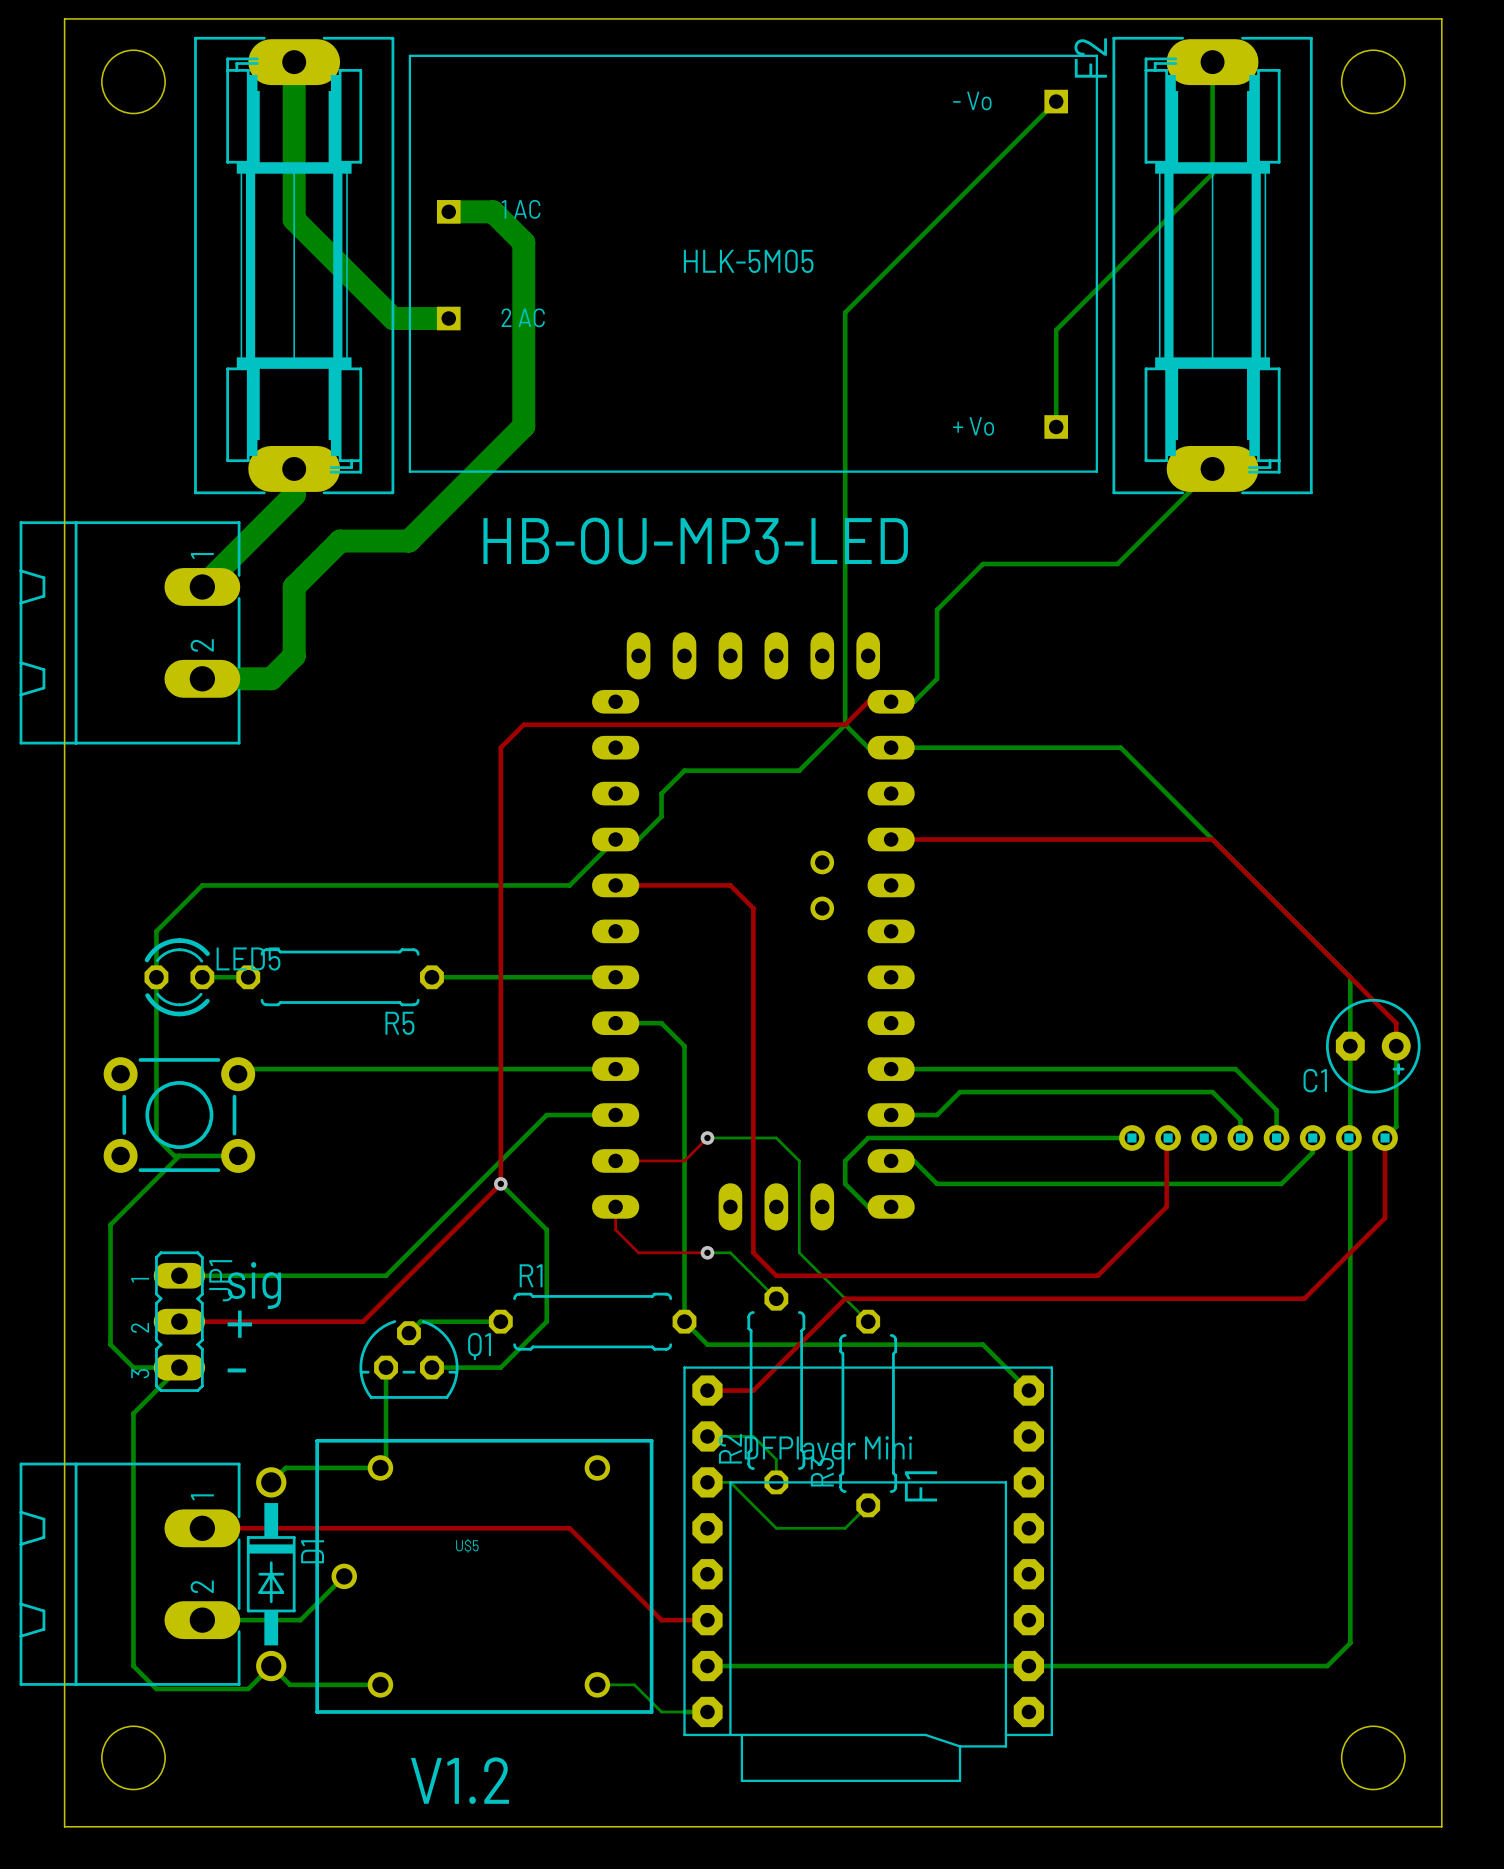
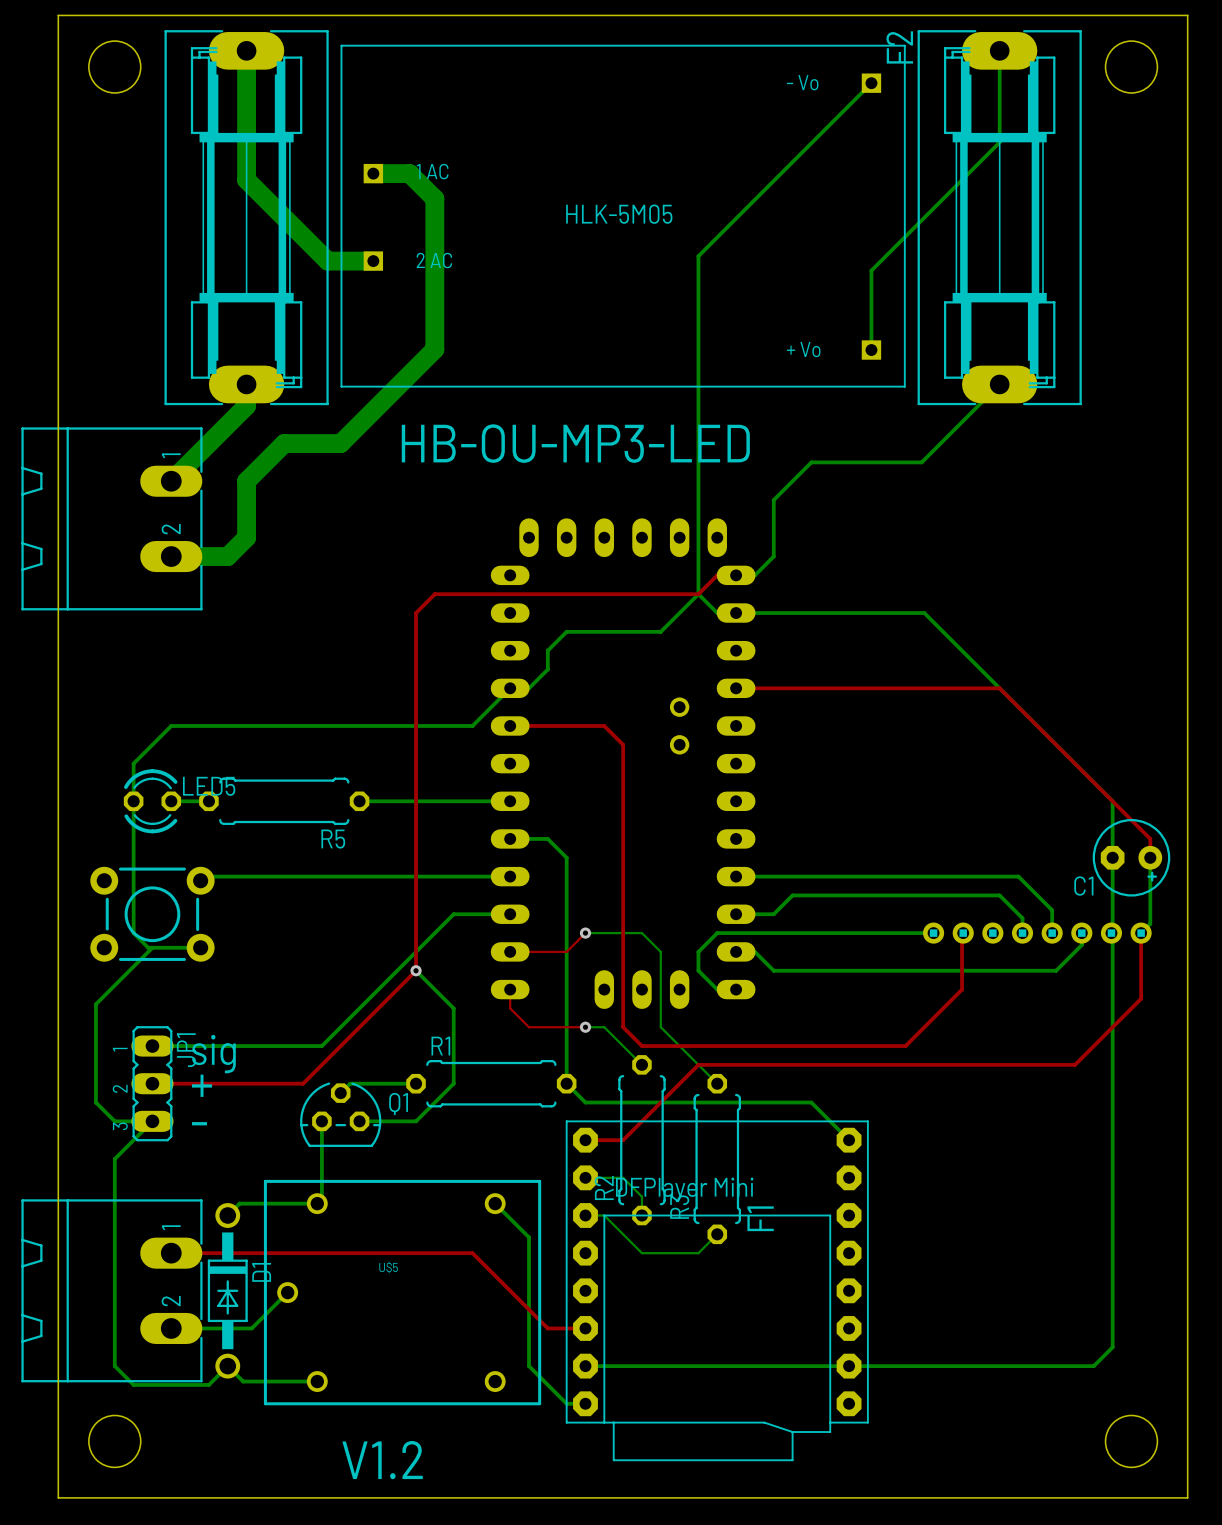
bottom track: (597, 1684) (634, 1684) (661, 1711) (684, 1711) -> (495, 1203) (529, 1237) (529, 1366) (566, 1403)

